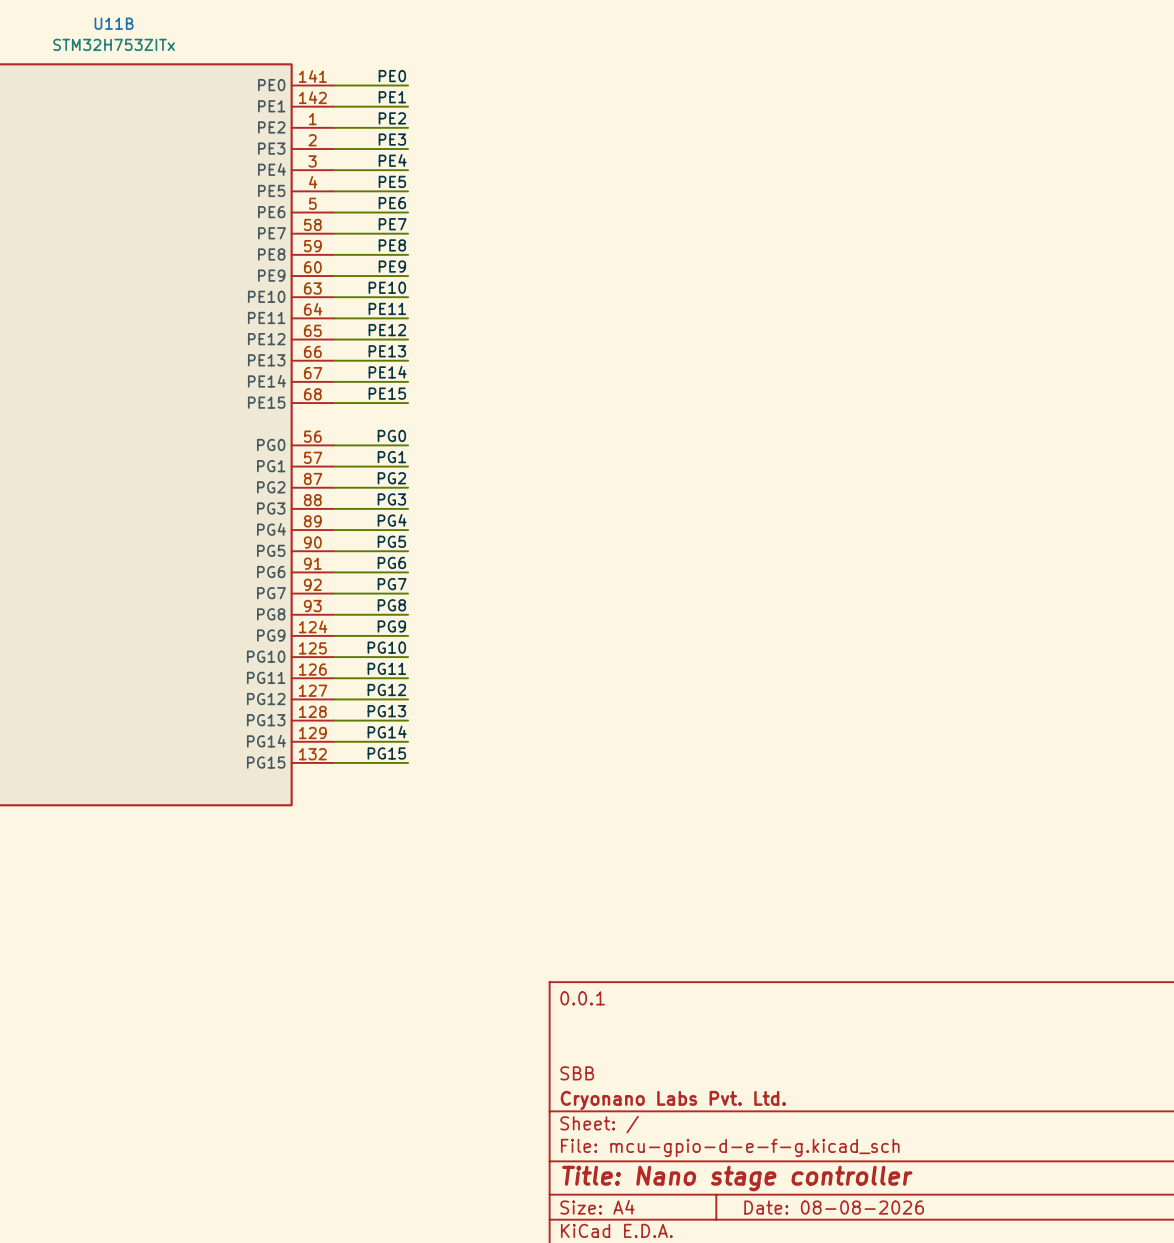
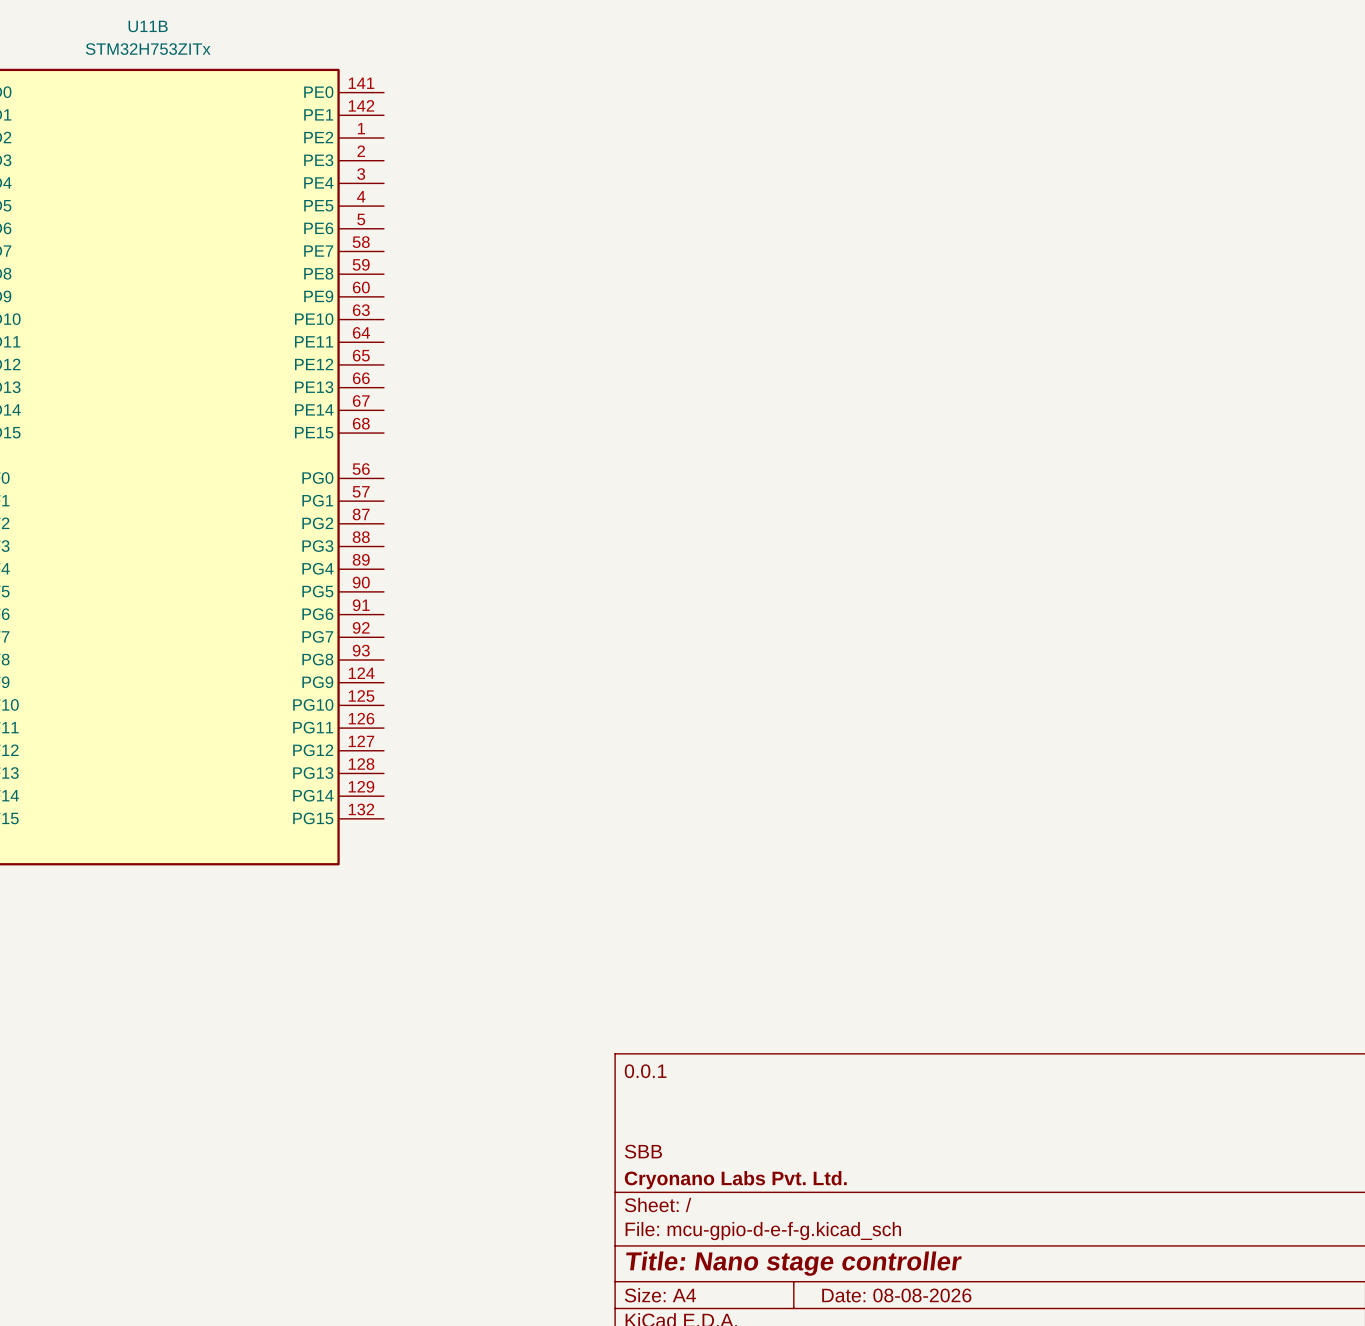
label: PE0 (392, 76) -> none
wire: (334, 85) (408, 85) -> none
label: PE1 (392, 97) -> none
wire: (334, 106) (408, 106) -> none
label: PE2 (392, 118) -> none
wire: (334, 127) (408, 127) -> none
label: PE3 (392, 139) -> none
wire: (334, 149) (408, 149) -> none
label: PE4 (392, 160) -> none
wire: (334, 170) (408, 170) -> none
label: PE5 (392, 181) -> none
wire: (334, 191) (408, 191) -> none
label: PE6 (392, 203) -> none
wire: (334, 212) (408, 212) -> none
label: PE7 (392, 224) -> none
wire: (334, 233) (408, 233) -> none
label: PE8 (392, 245) -> none
wire: (334, 254) (408, 254) -> none
label: PE9 (392, 266) -> none
wire: (334, 276) (408, 276) -> none
label: PE10 (387, 287) -> none
wire: (334, 297) (408, 297) -> none
label: PE11 (387, 308) -> none
wire: (334, 318) (408, 318) -> none
label: PE12 (387, 330) -> none
wire: (334, 339) (408, 339) -> none
label: PE13 (387, 351) -> none
wire: (334, 360) (408, 360) -> none
label: PE14 (387, 372) -> none
wire: (334, 381) (408, 381) -> none
label: PE15 (387, 393) -> none
wire: (334, 403) (408, 403) -> none
label: PG0 (391, 435) -> none
wire: (334, 445) (408, 445) -> none
label: PG1 (391, 457) -> none
wire: (334, 466) (408, 466) -> none
label: PG2 (391, 478) -> none
wire: (334, 487) (408, 487) -> none
label: PG3 (391, 499) -> none
wire: (334, 508) (408, 508) -> none
label: PG4 (392, 520) -> none
wire: (334, 530) (408, 530) -> none
label: PG5 (391, 541) -> none
wire: (334, 551) (408, 551) -> none
label: PG6 (391, 562) -> none
wire: (334, 572) (408, 572) -> none
label: PG7 (392, 584) -> none
wire: (334, 593) (408, 593) -> none
label: PG8 (391, 605) -> none
wire: (334, 614) (408, 614) -> none
label: PG9 (391, 626) -> none
wire: (334, 635) (408, 635) -> none
label: PG10 (386, 647) -> none
wire: (334, 657) (408, 657) -> none
label: PG11 (386, 668) -> none
wire: (334, 678) (408, 678) -> none
label: PG12 (386, 689) -> none
wire: (334, 699) (408, 699) -> none
label: PG13 (386, 711) -> none
wire: (334, 720) (408, 720) -> none
label: PG14 (387, 732) -> none
wire: (334, 741) (408, 741) -> none
label: PG15 (386, 753) -> none
wire: (334, 762) (408, 762) -> none

